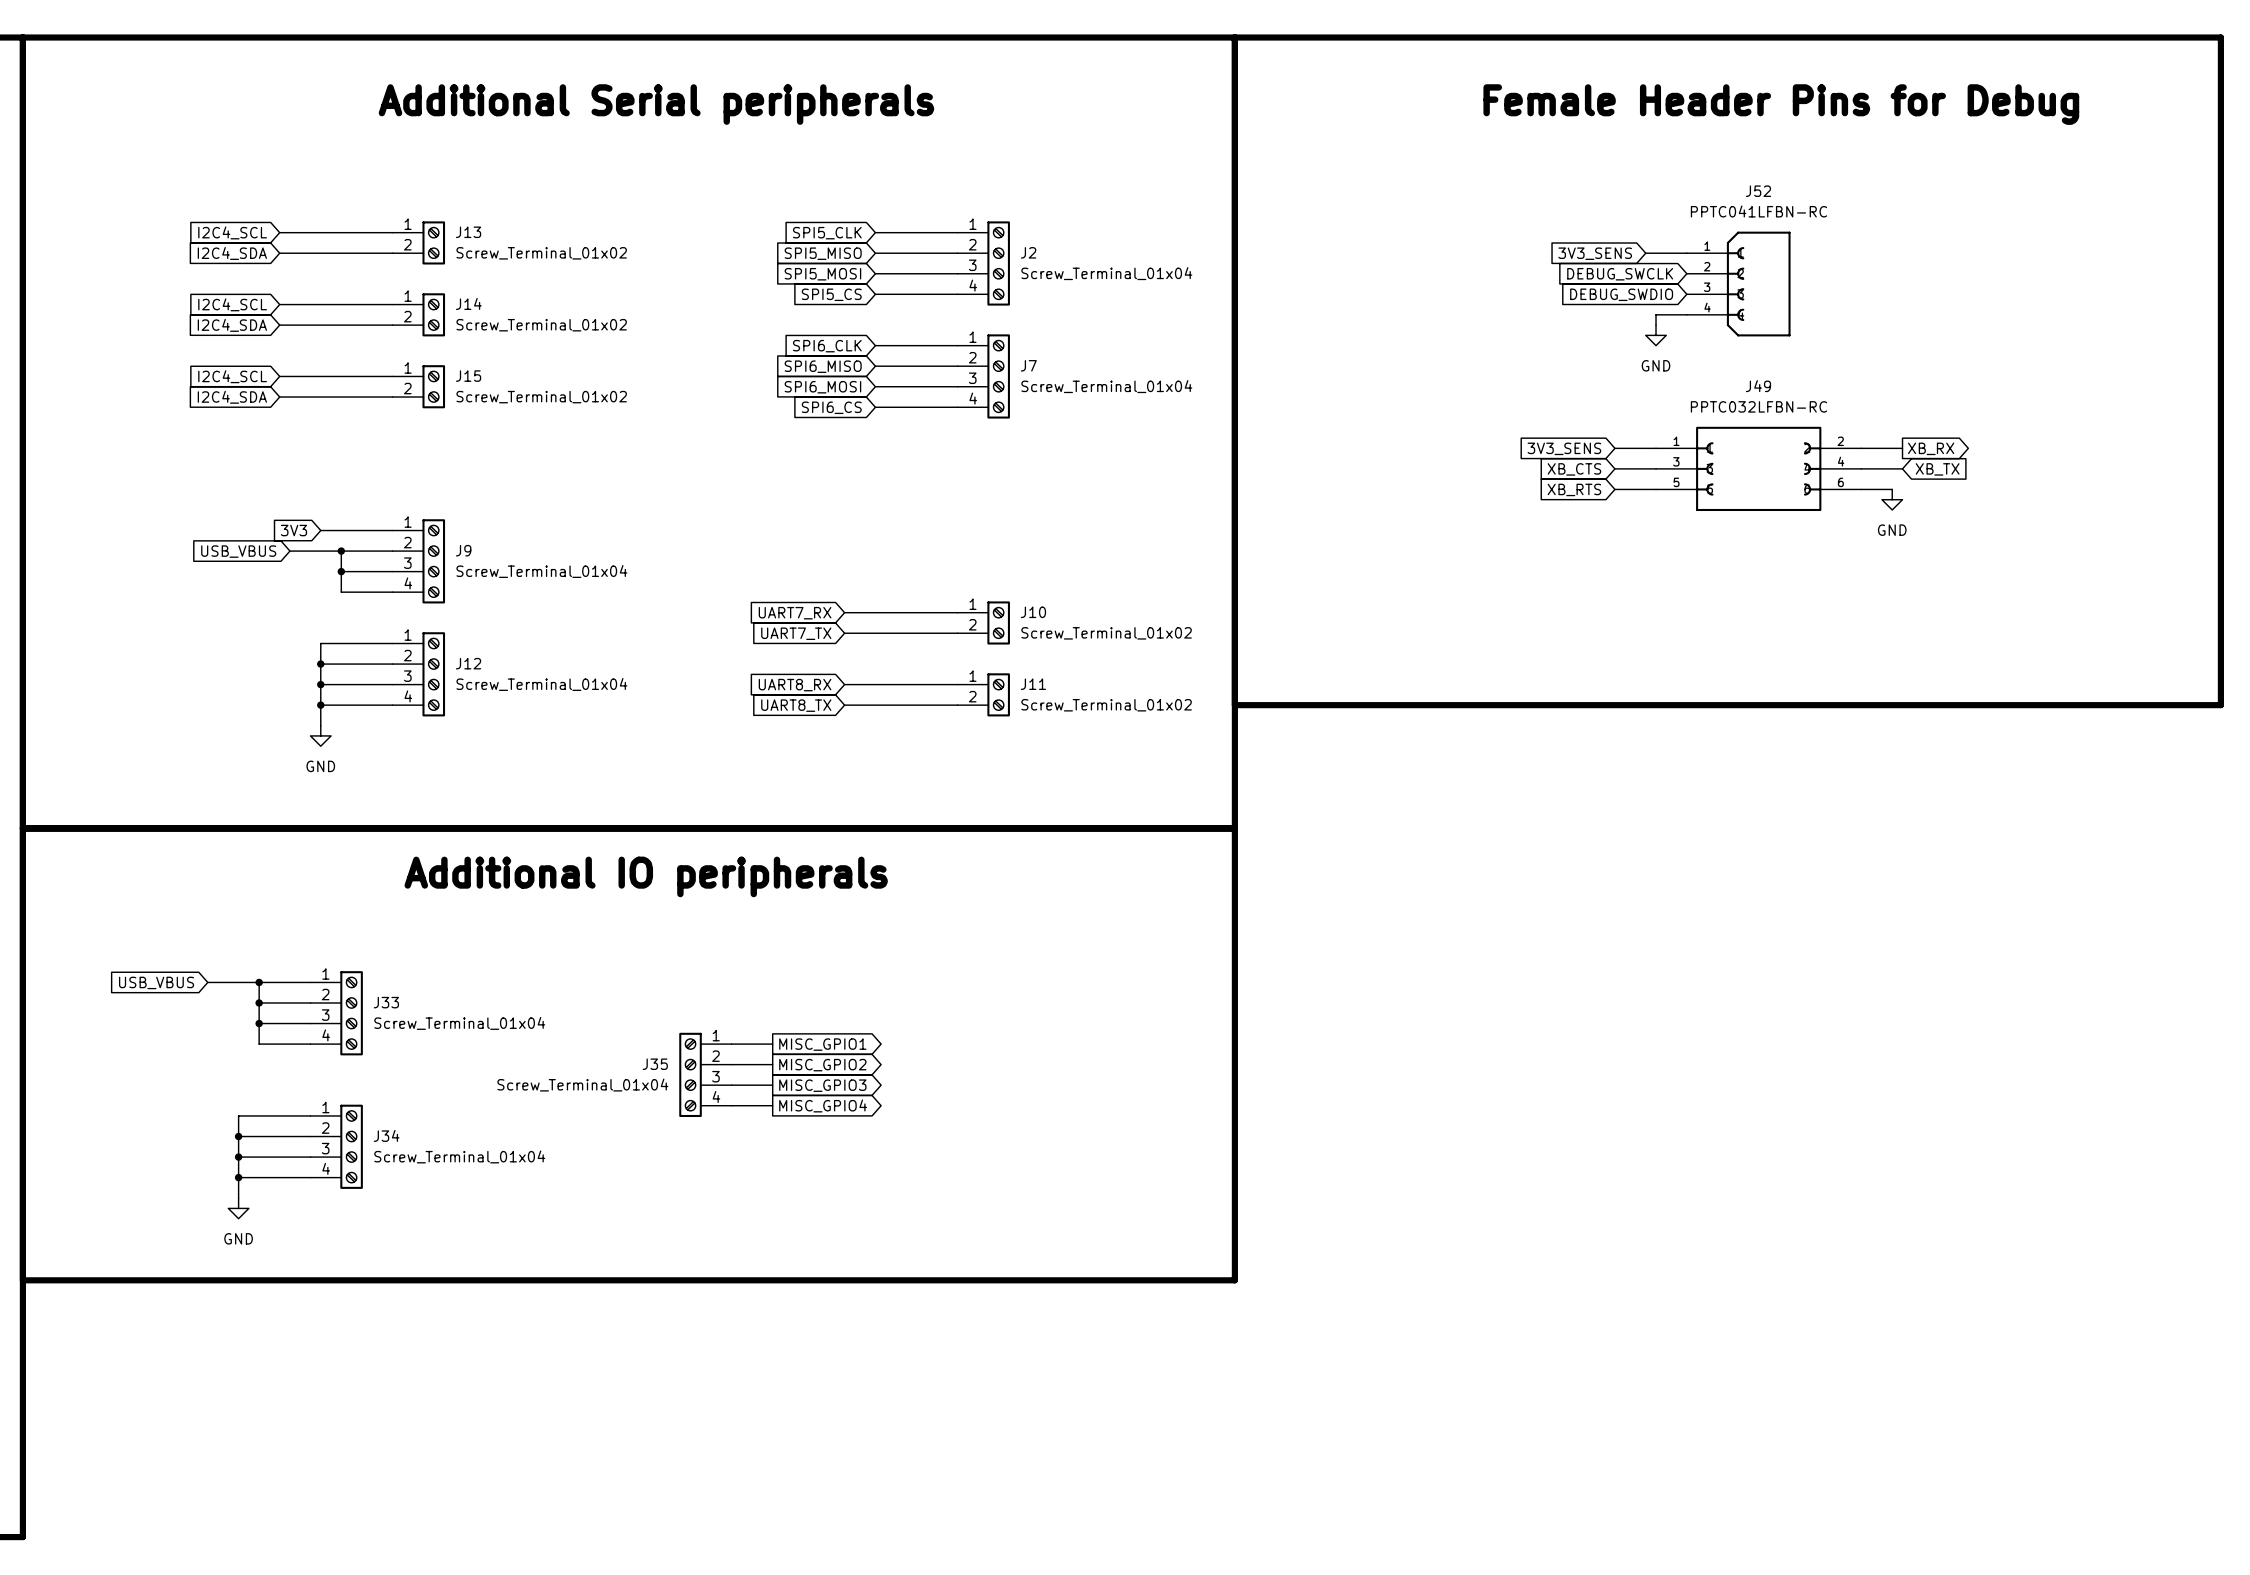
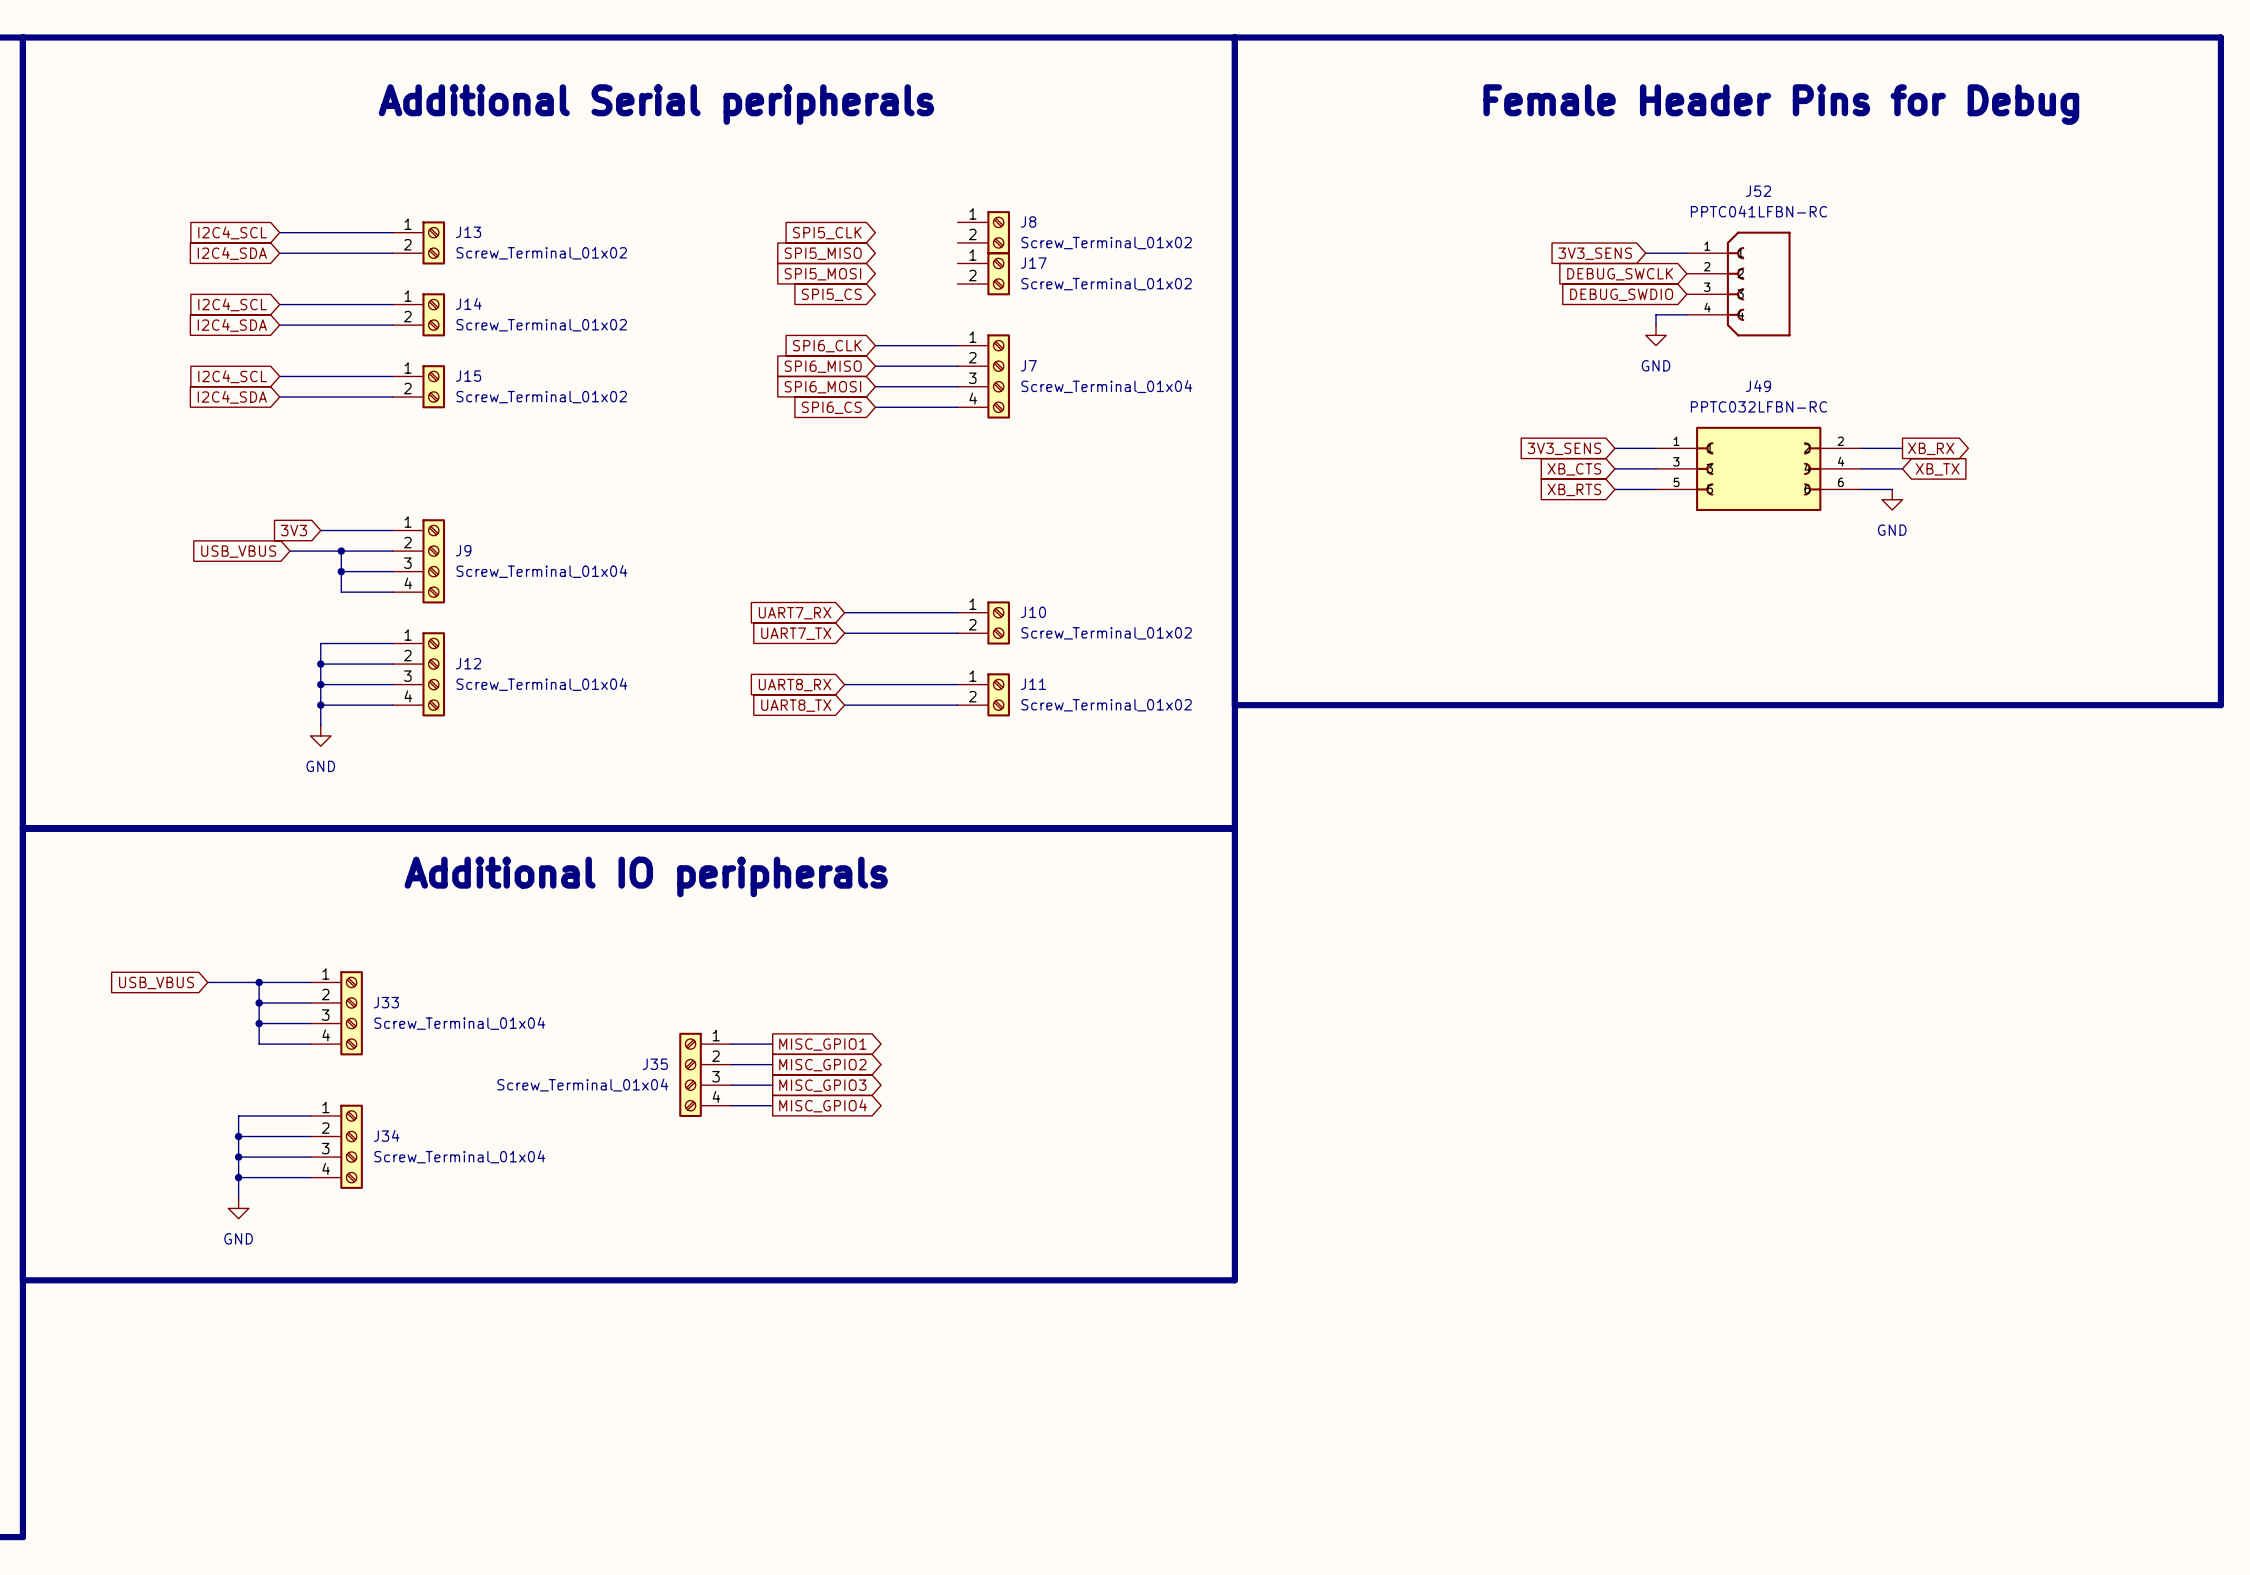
wire: (875, 232) (957, 232) -> none
J8: none -> Screw_Terminal_01x02 (983, 232)
wire: (875, 253) (957, 253) -> none
J2: Screw_Terminal_01x04 (983, 263) -> none
wire: (875, 273) (957, 273) -> none
J17: none -> Screw_Terminal_01x02 (983, 273)
wire: (875, 294) (957, 294) -> none

